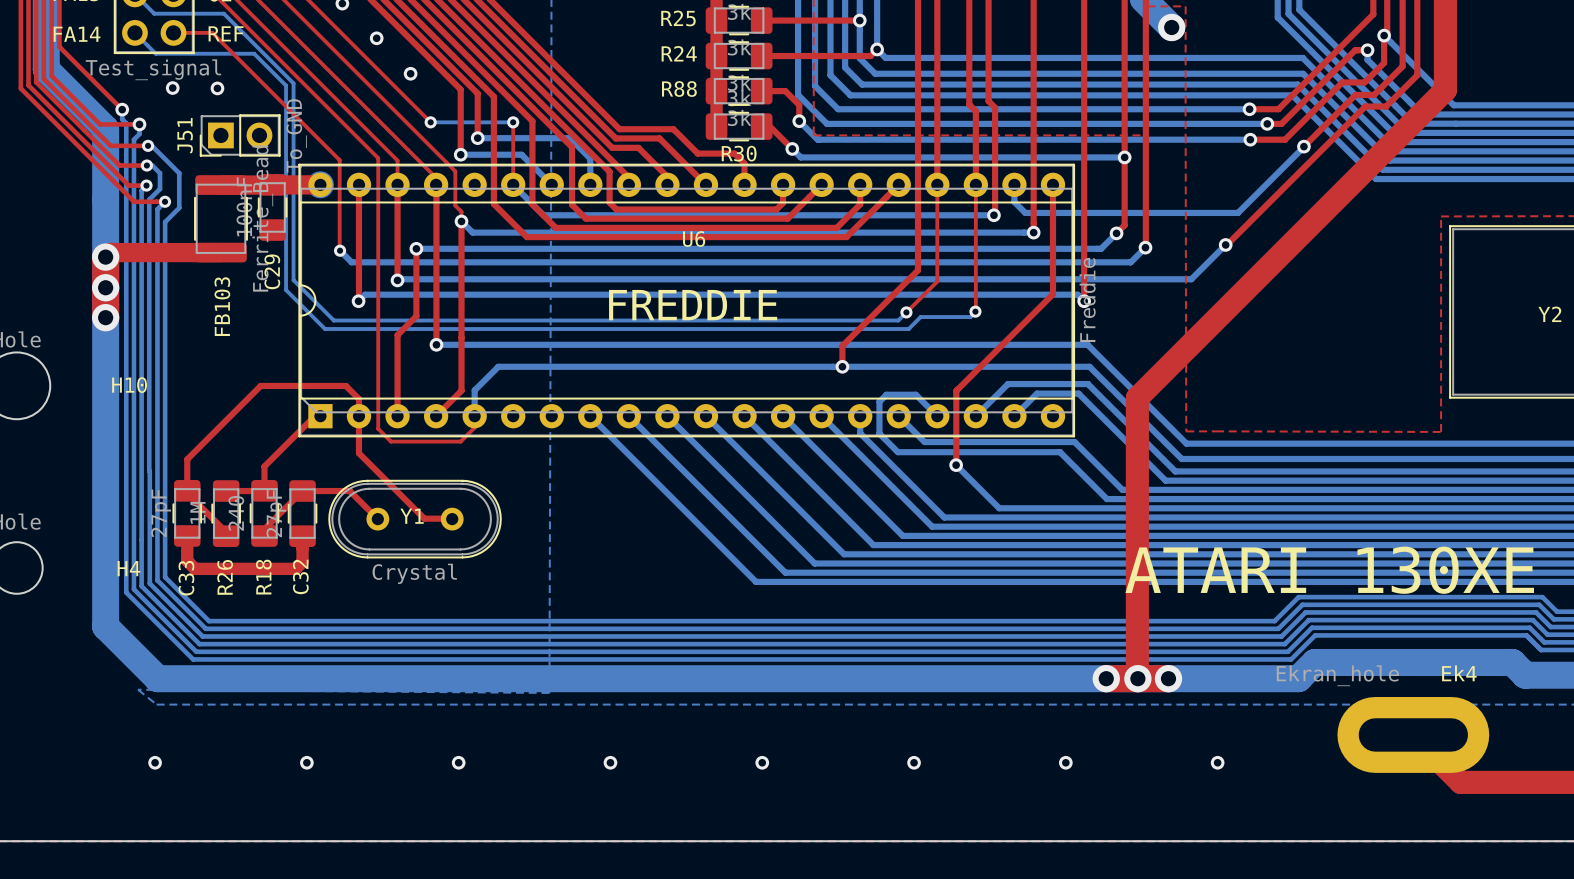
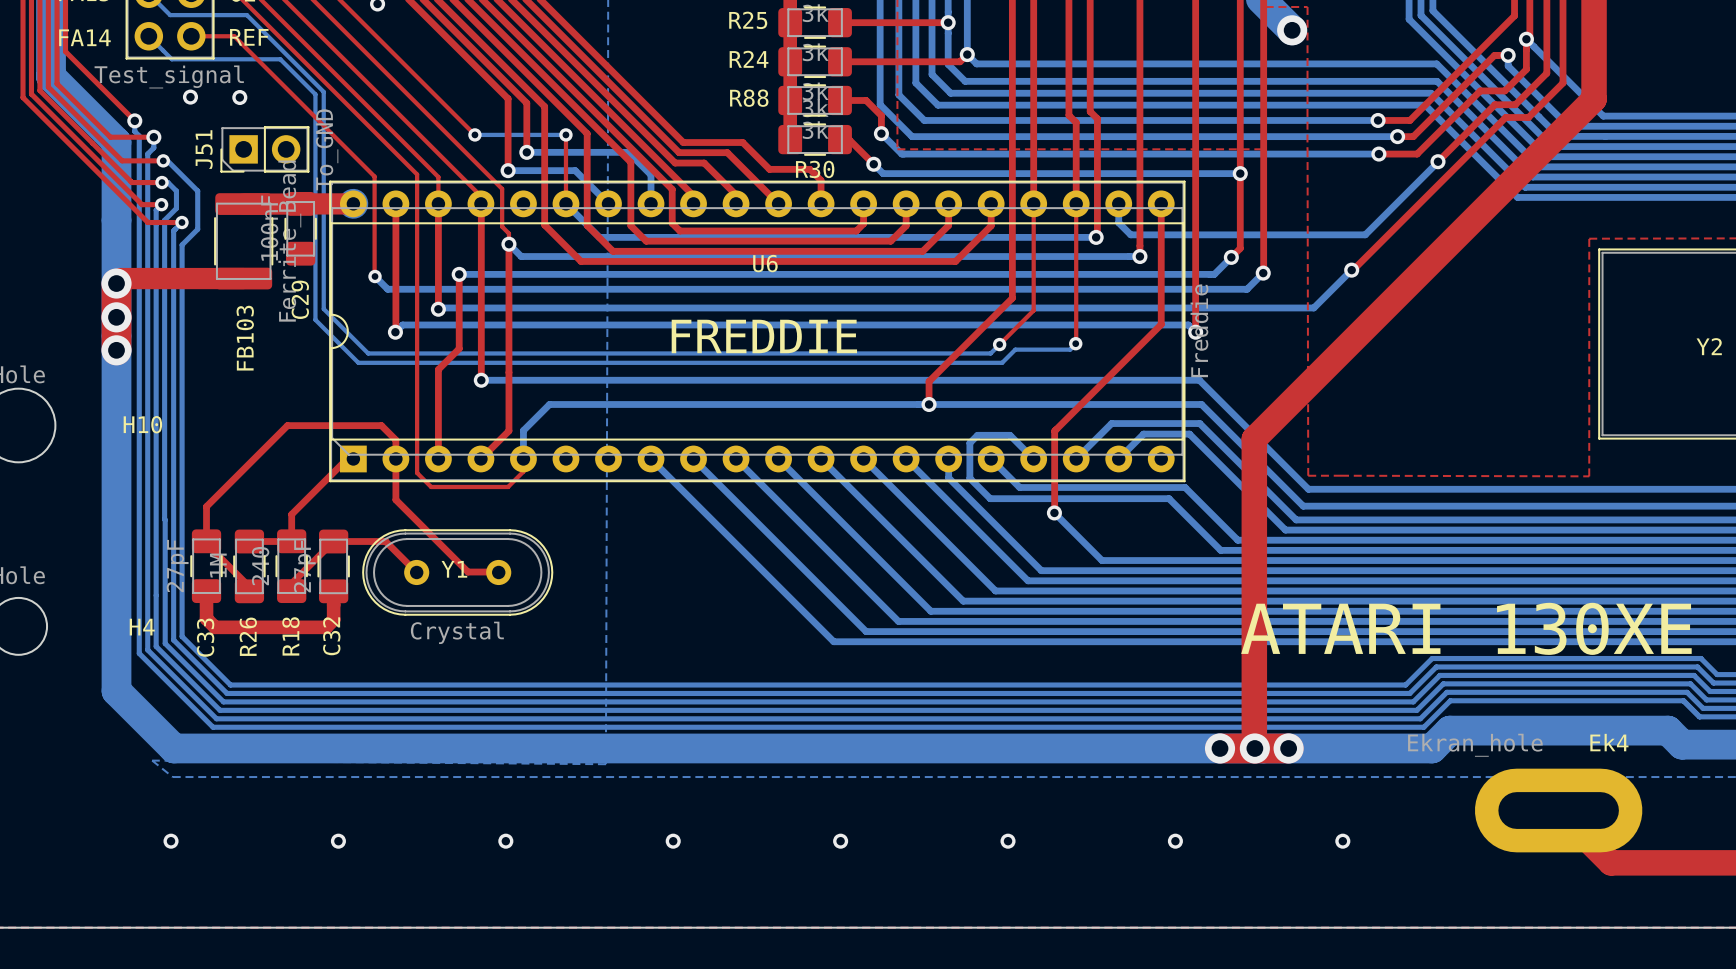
via: (376, 38) -> none
via: (410, 73) -> none
top track: (821, 184) (787, 218) -> (906, 203) (906, 225) (890, 241) (868, 241)
top track: (898, 184) (846, 237) -> (991, 203) (991, 225) (955, 261) (933, 261)

